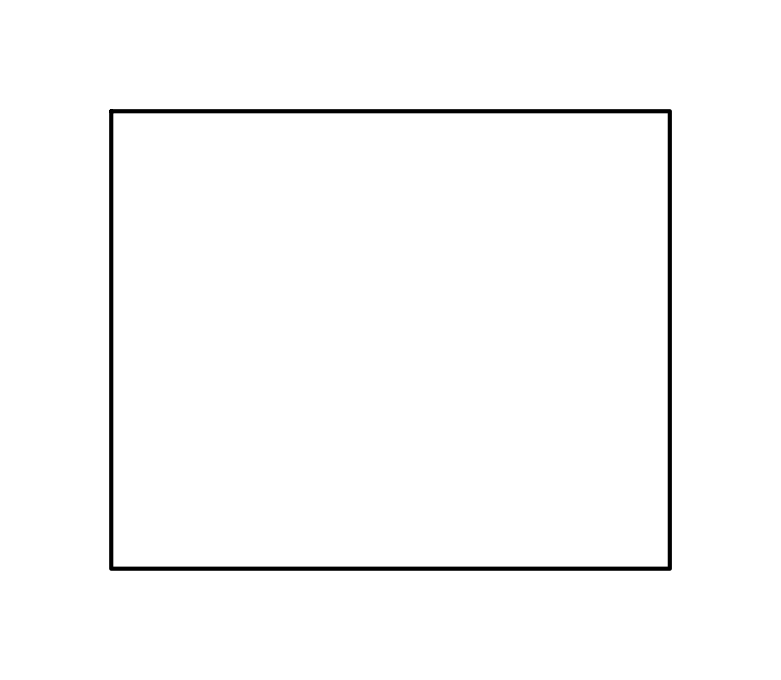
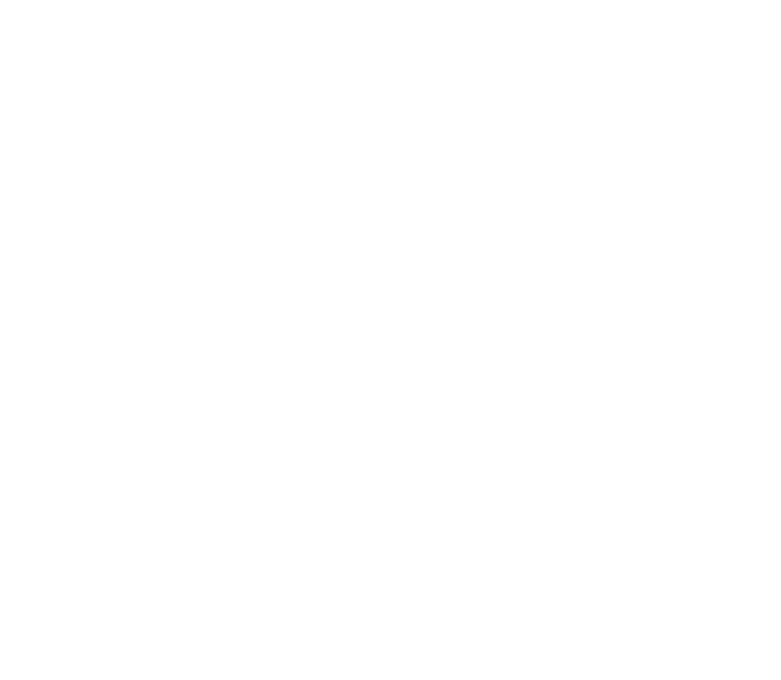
drawing: [109, 109, 672, 571] -> none

